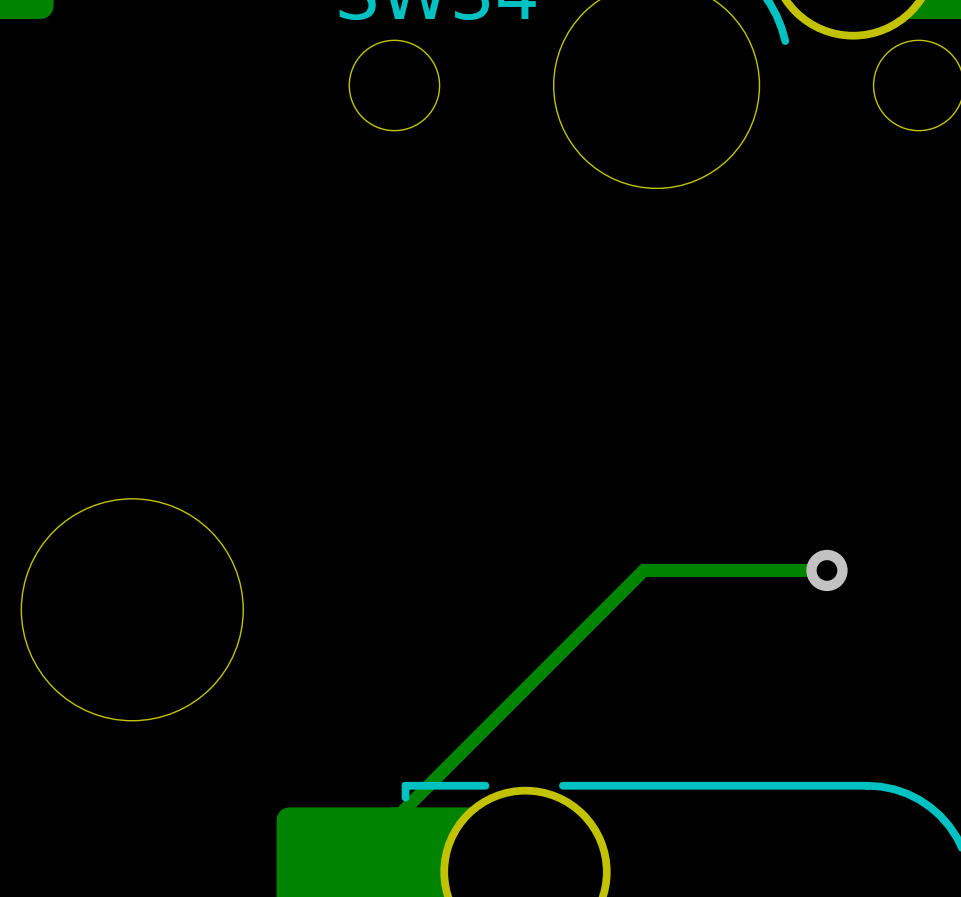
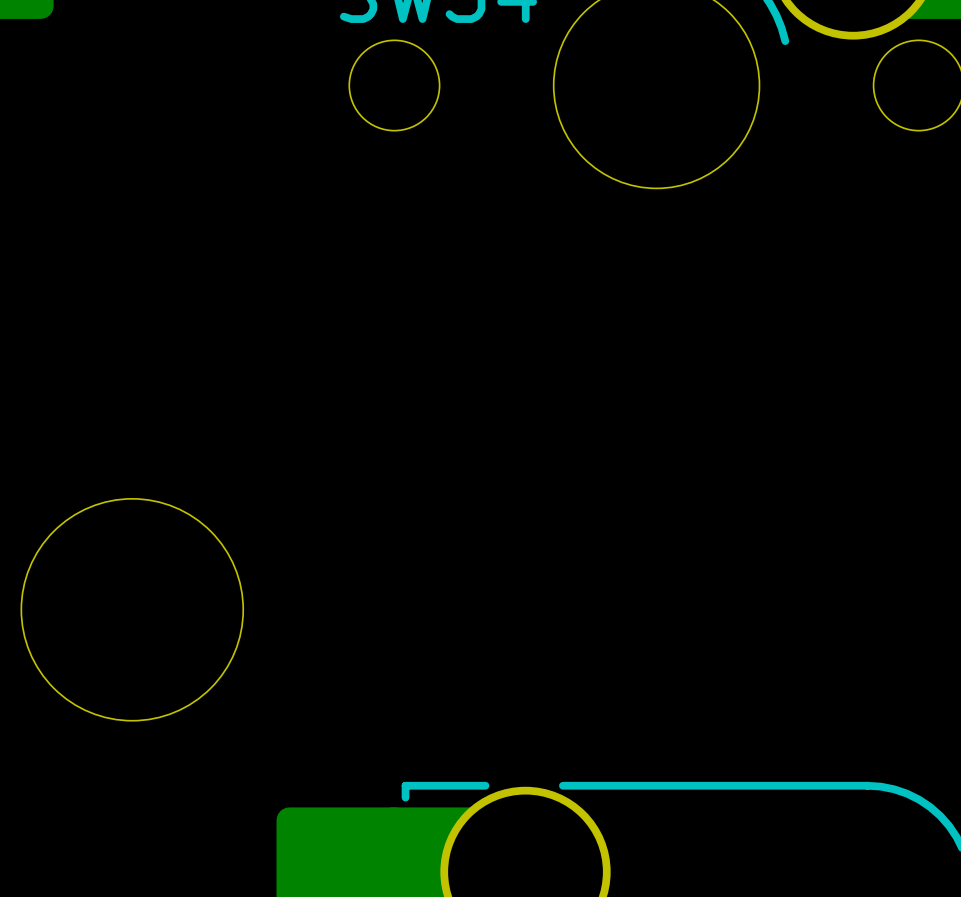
track: (826, 570) (643, 570) (342, 871) -> none
via: (826, 570) -> none

